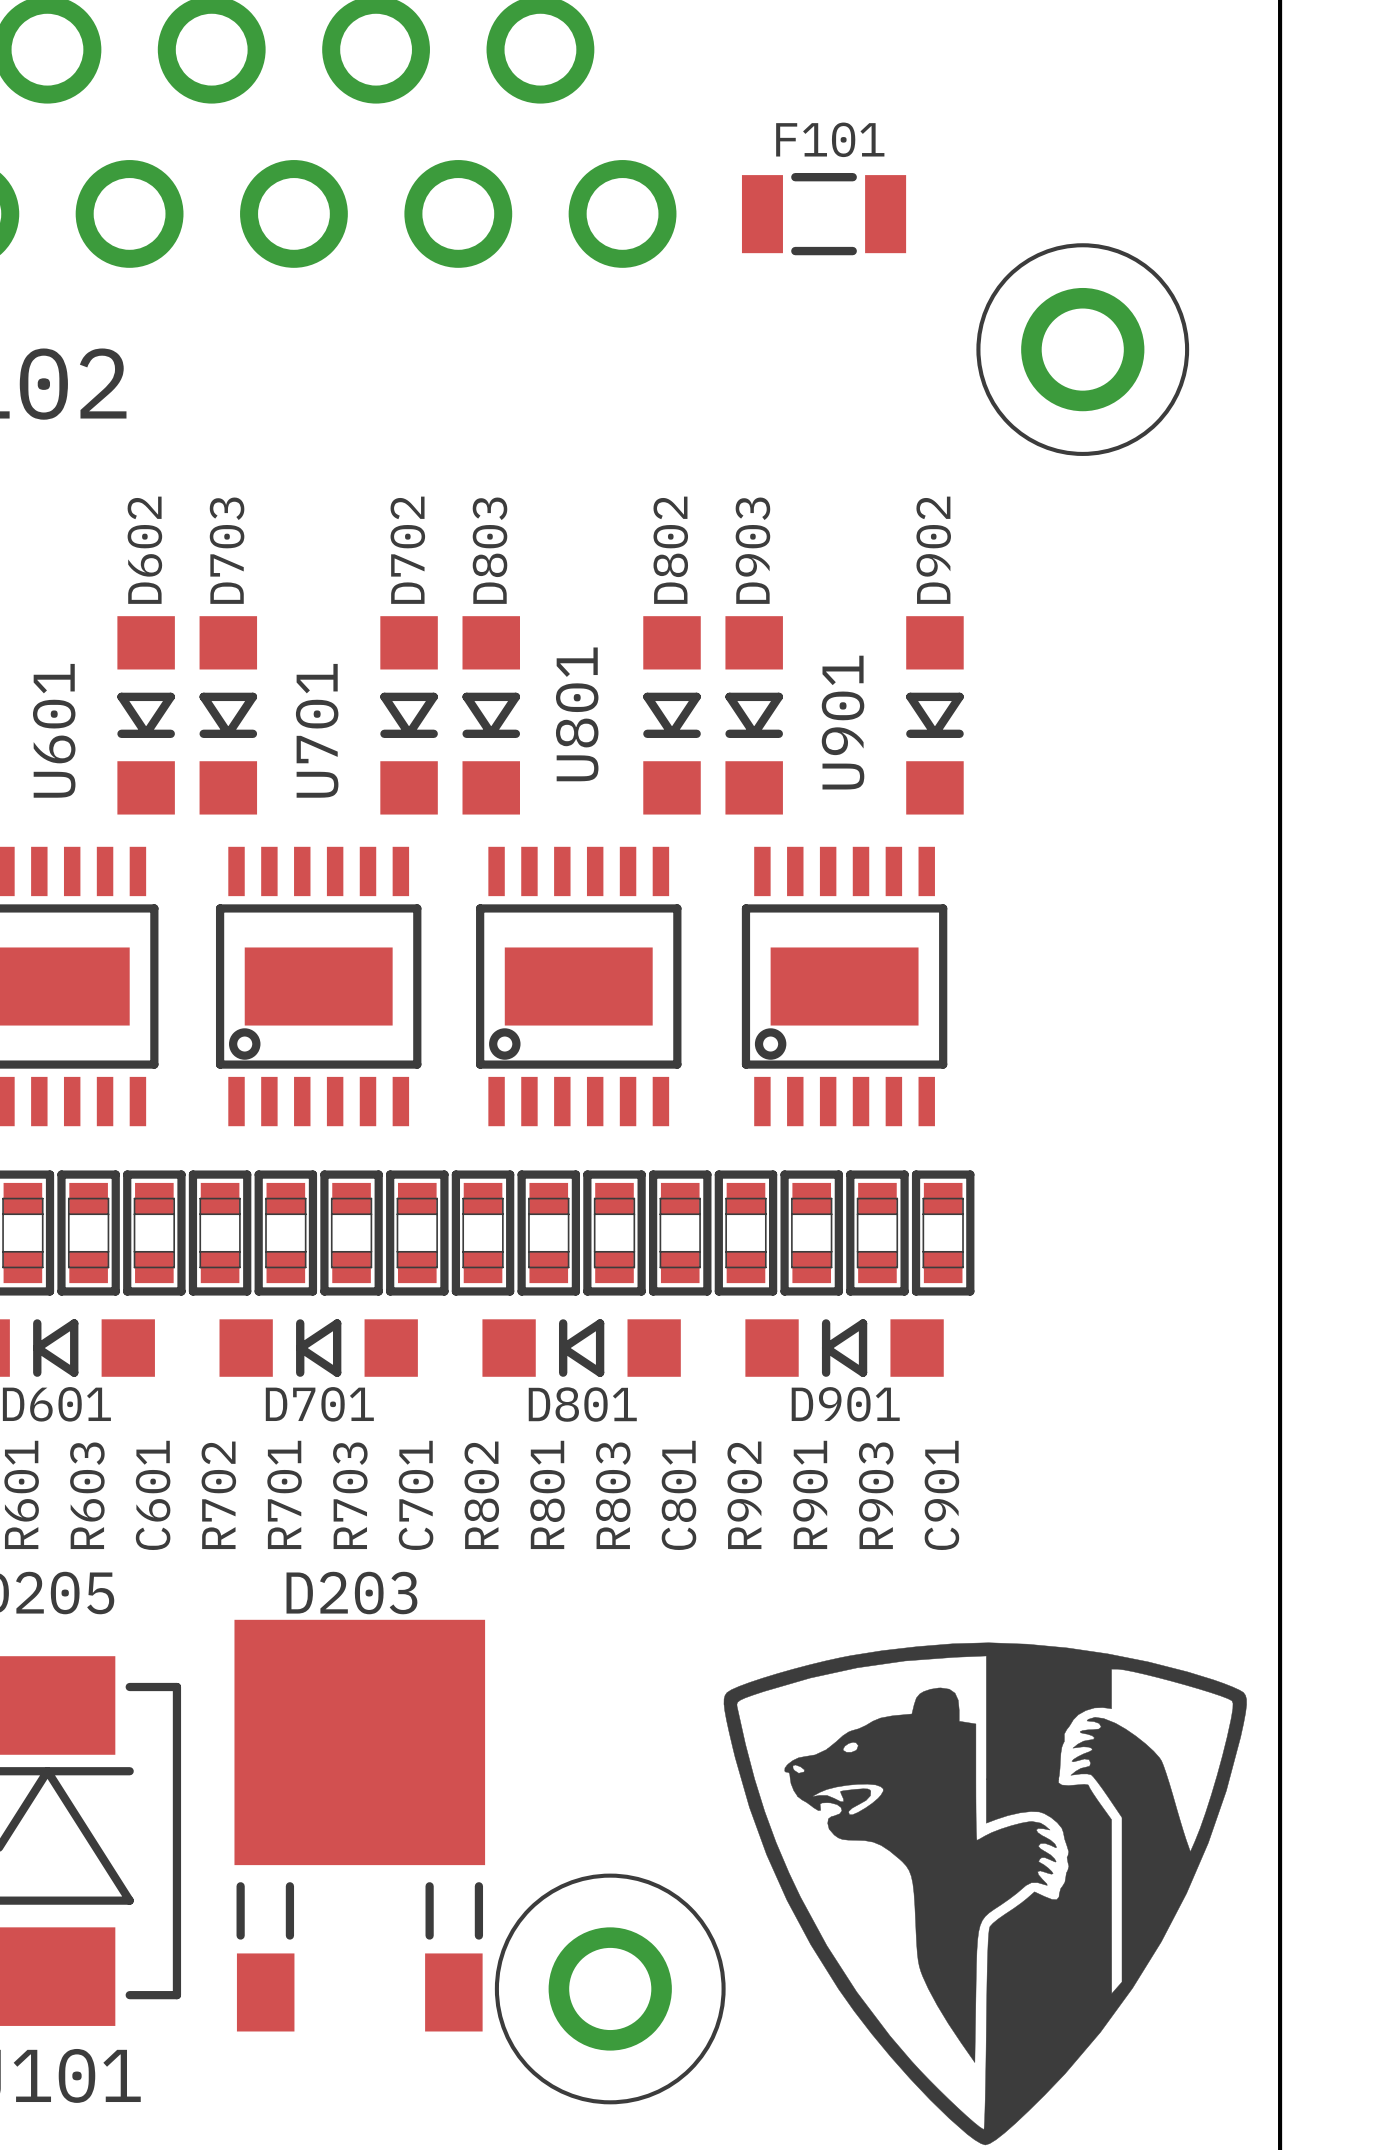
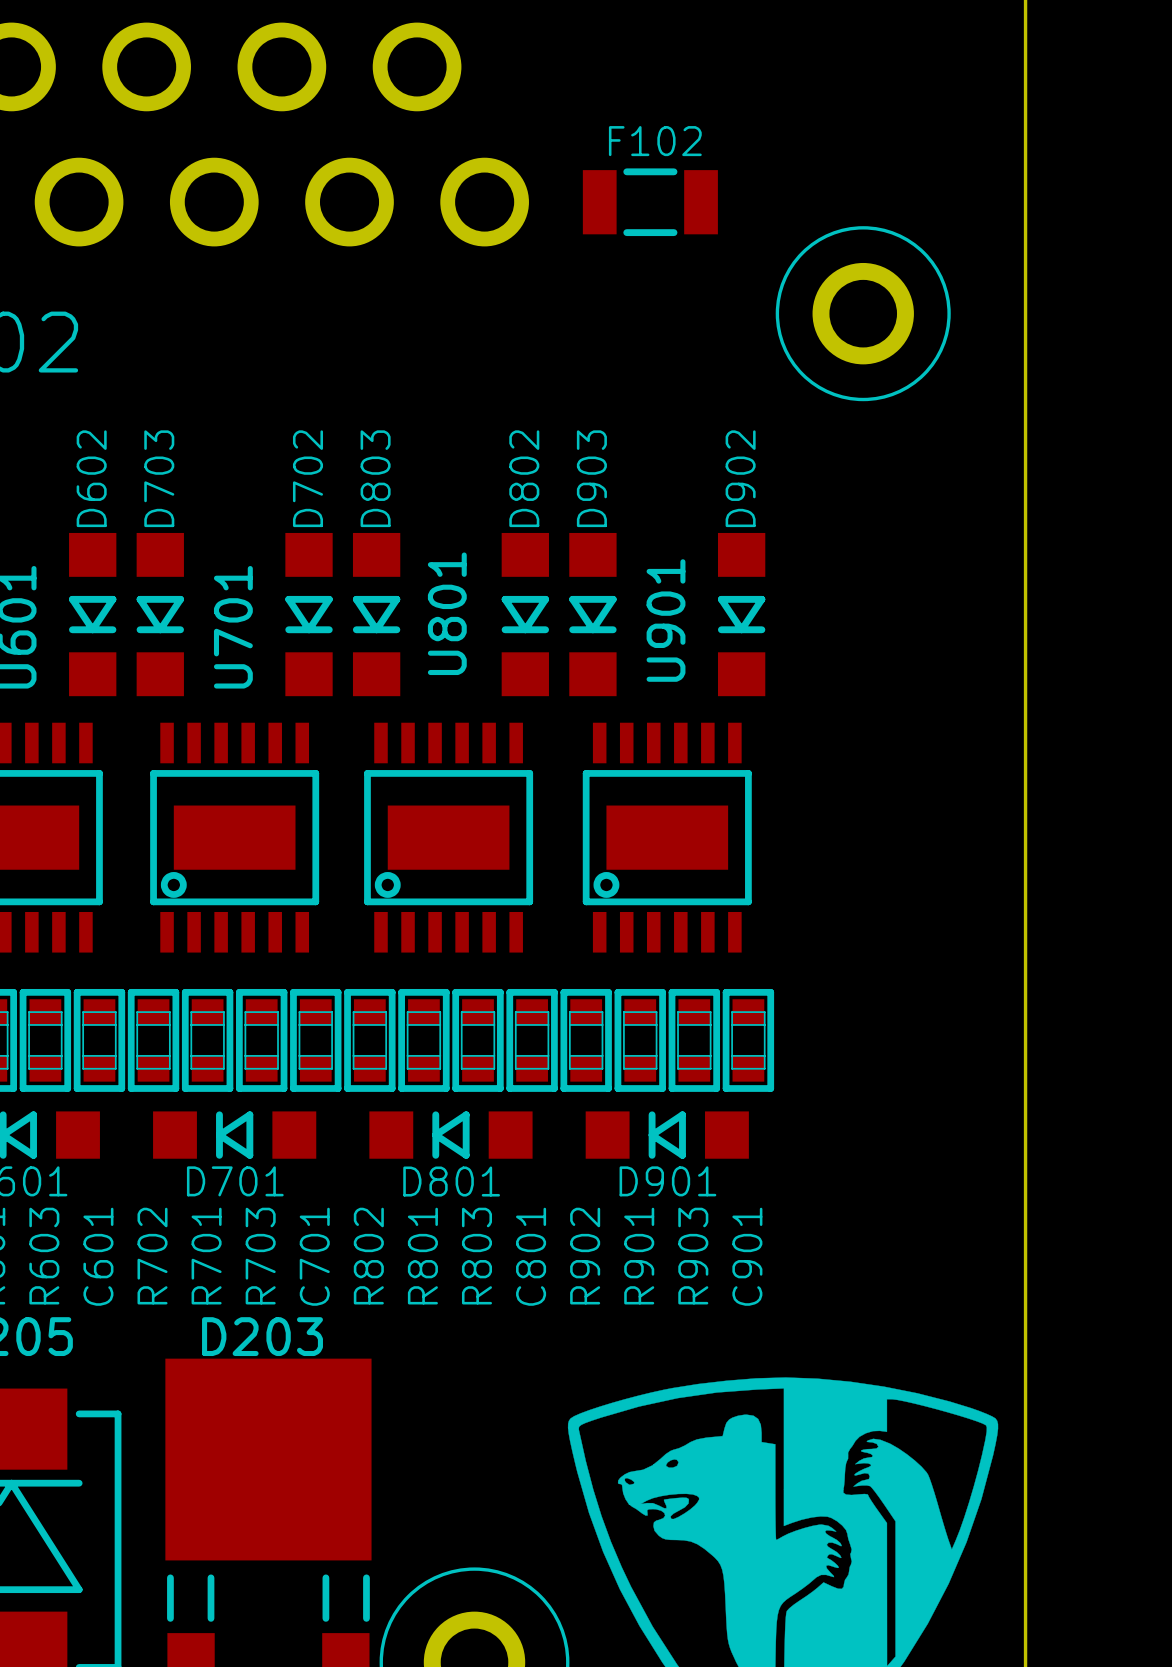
F101 name: F101 (830, 139) -> F102 (655, 141)

